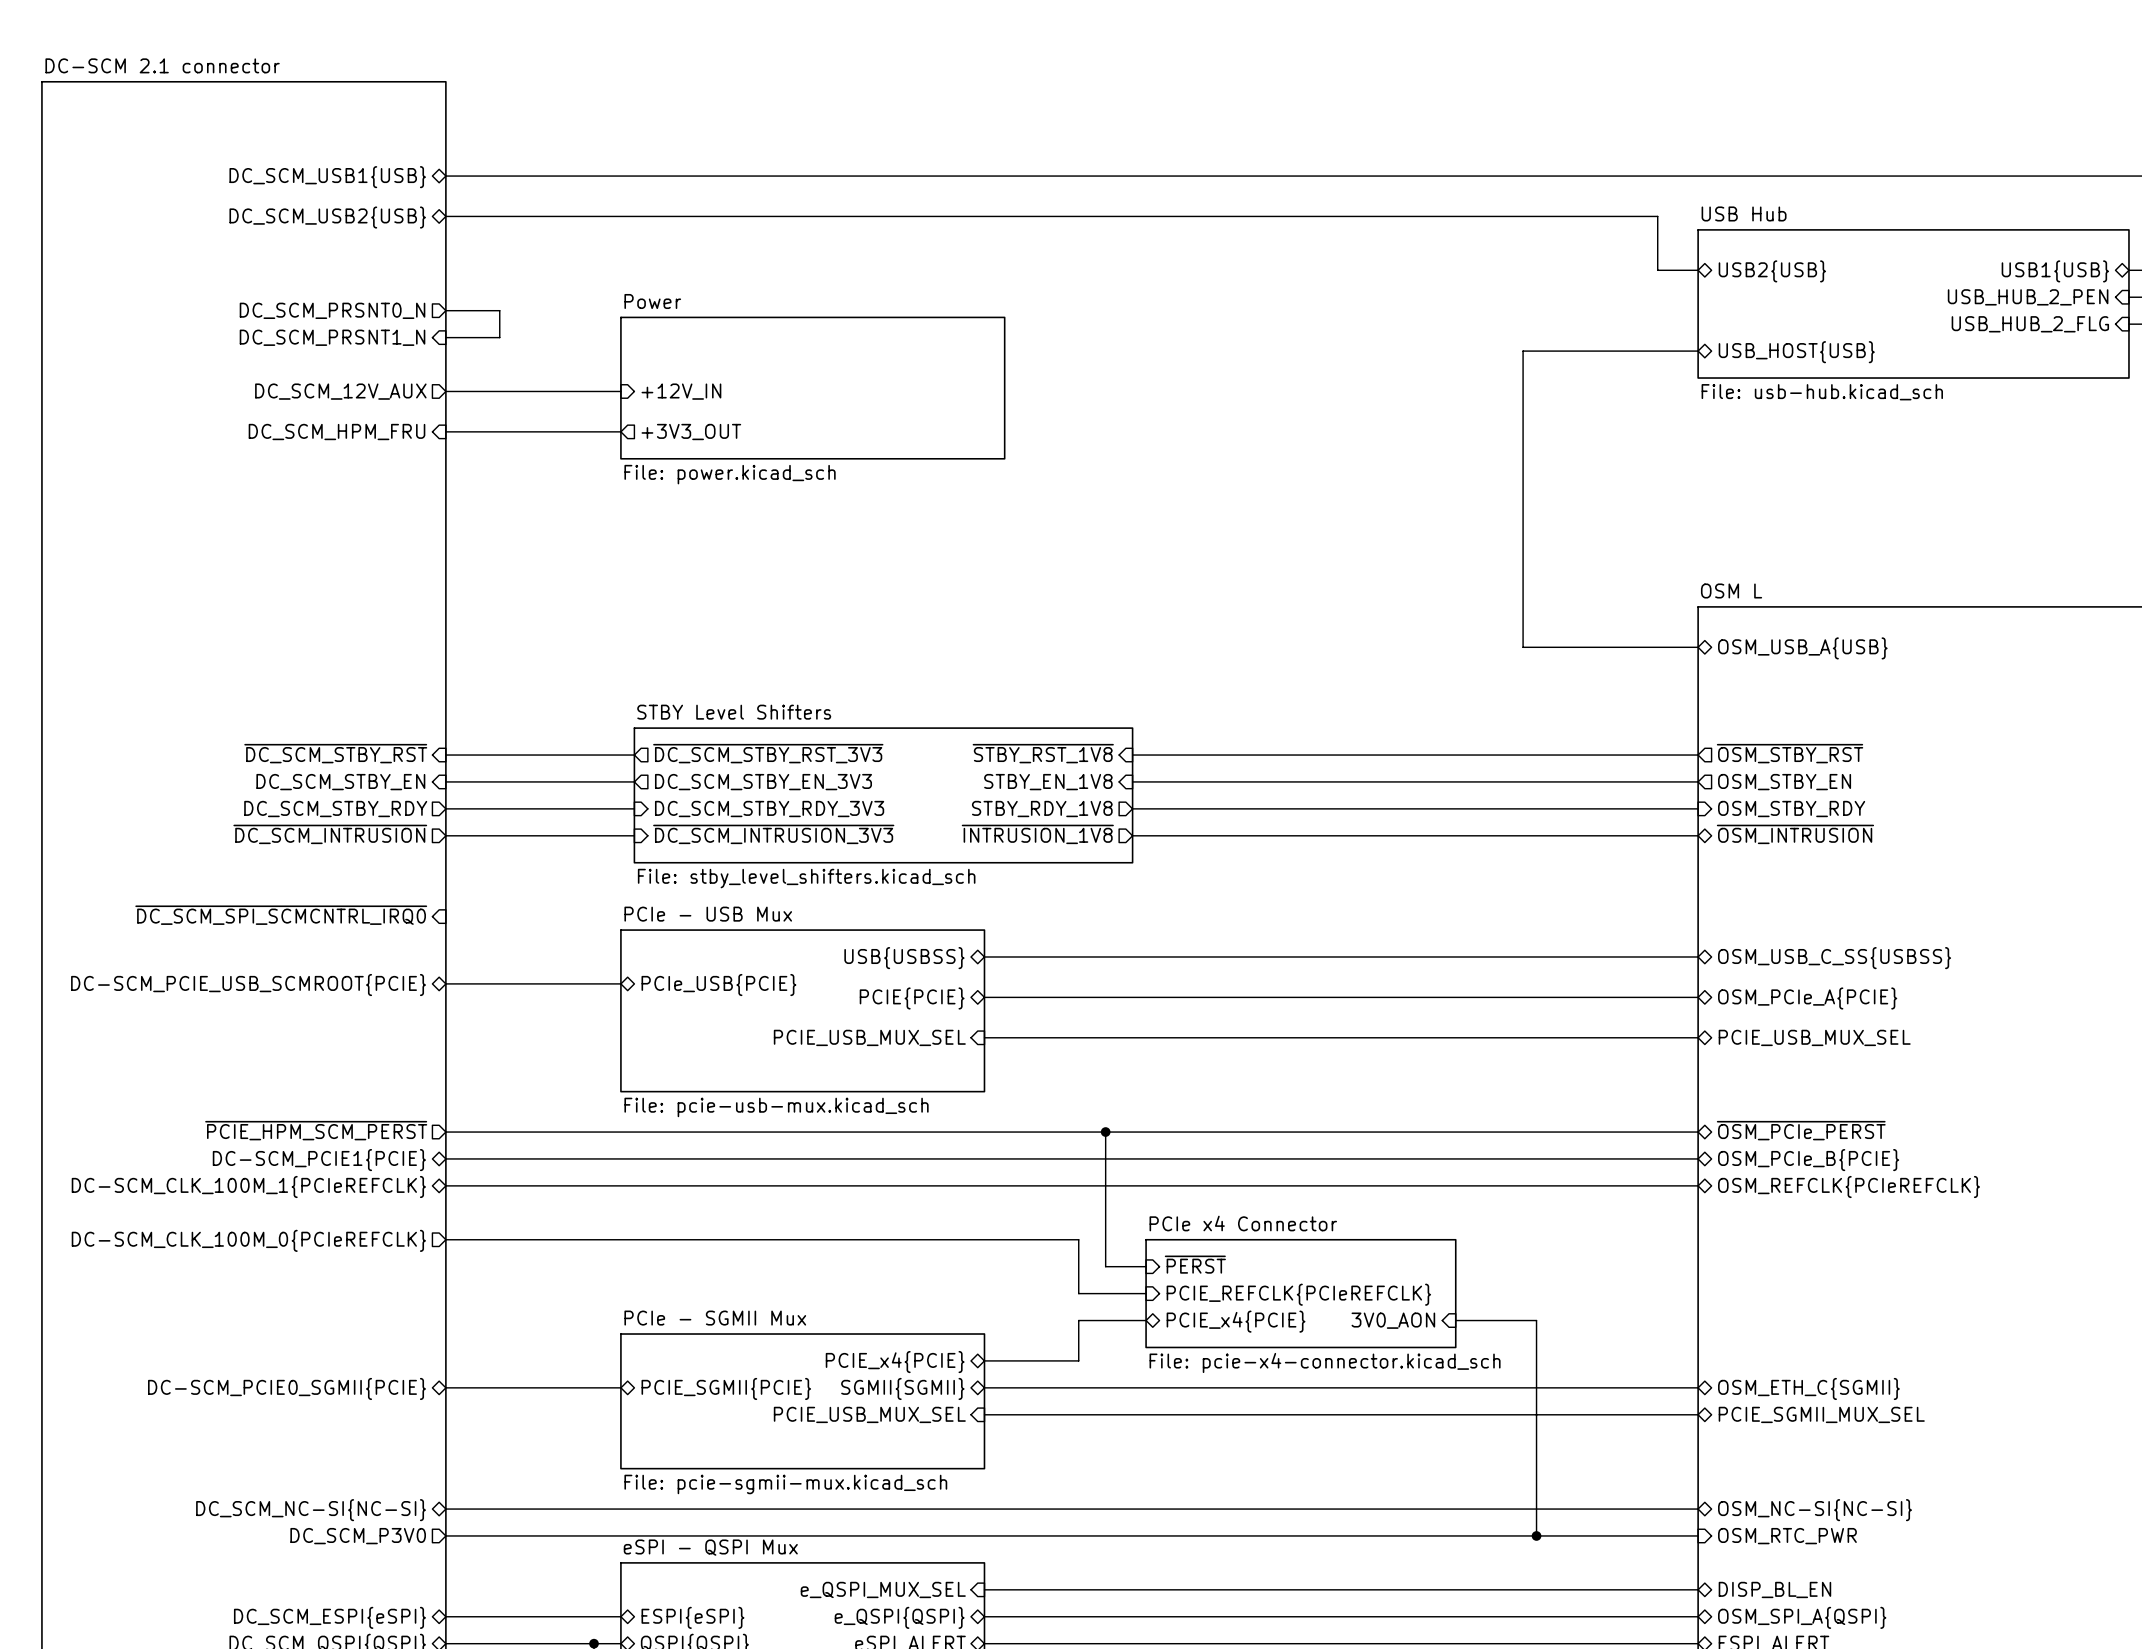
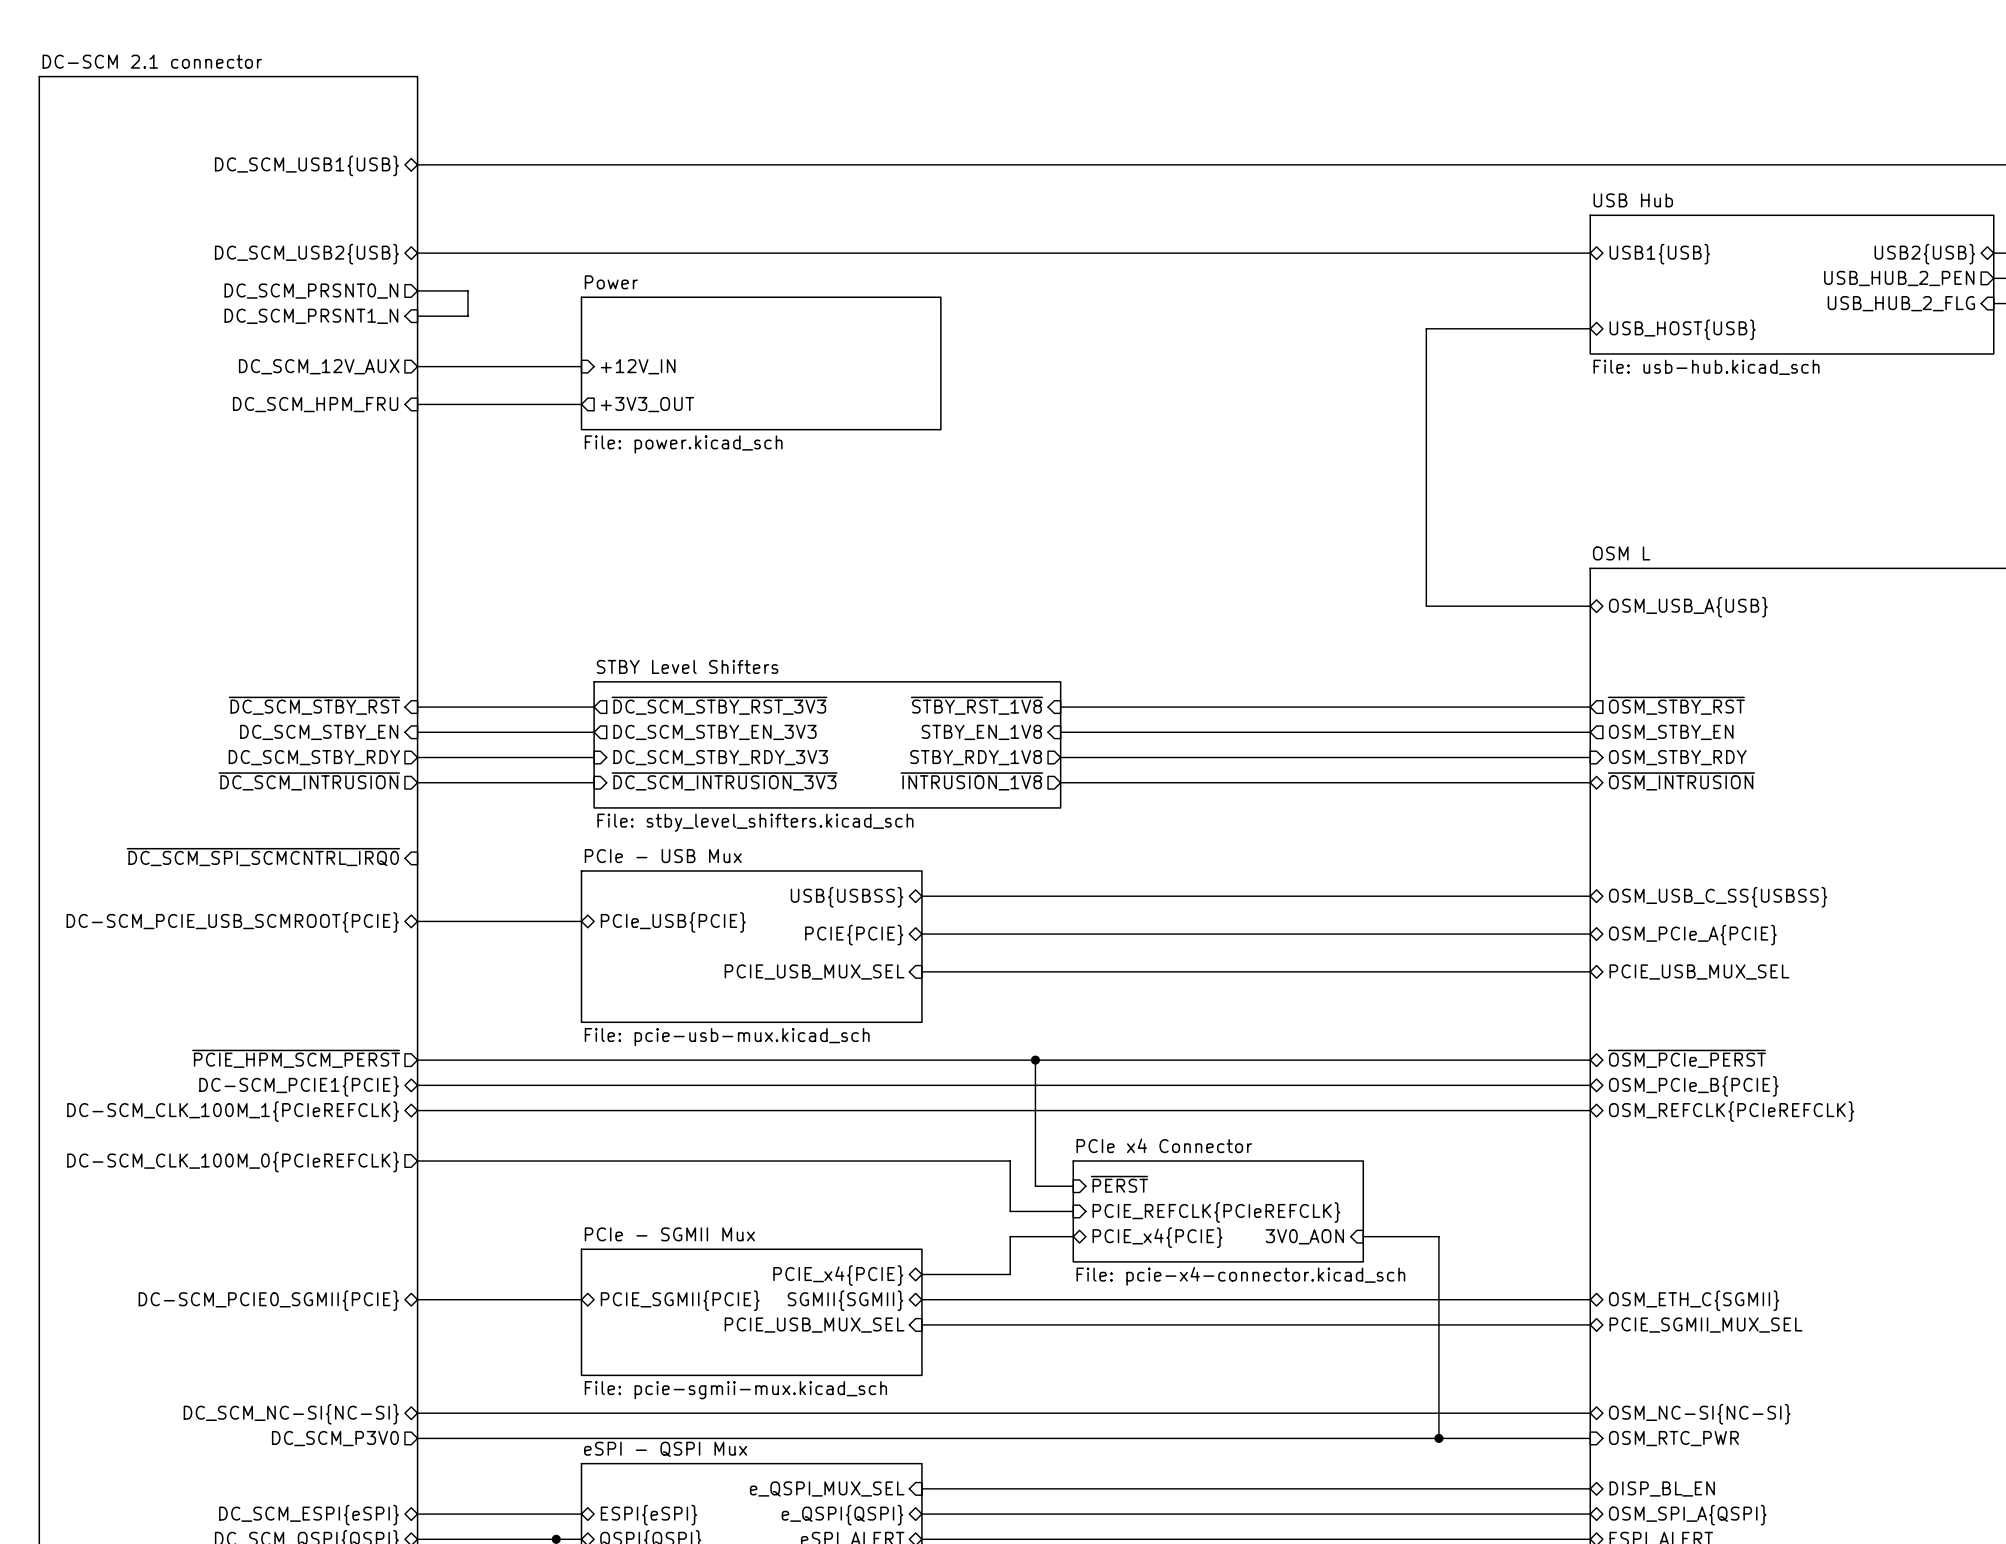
bus: (445, 216) (1657, 216) (1657, 270) -> (417, 253) (1552, 253)
sheet pin position: DC_SCM_USB2{USB} (327, 217) -> DC_SCM_USB2{USB} (306, 254)
sheet pin: USB2{USB} (1772, 271) -> USB1{USB} (1659, 254)
sheet pin: USB1{USB} (2055, 271) -> USB2{USB} (1924, 254)
sheet pin shape: input (2028, 297) -> output (1899, 278)

